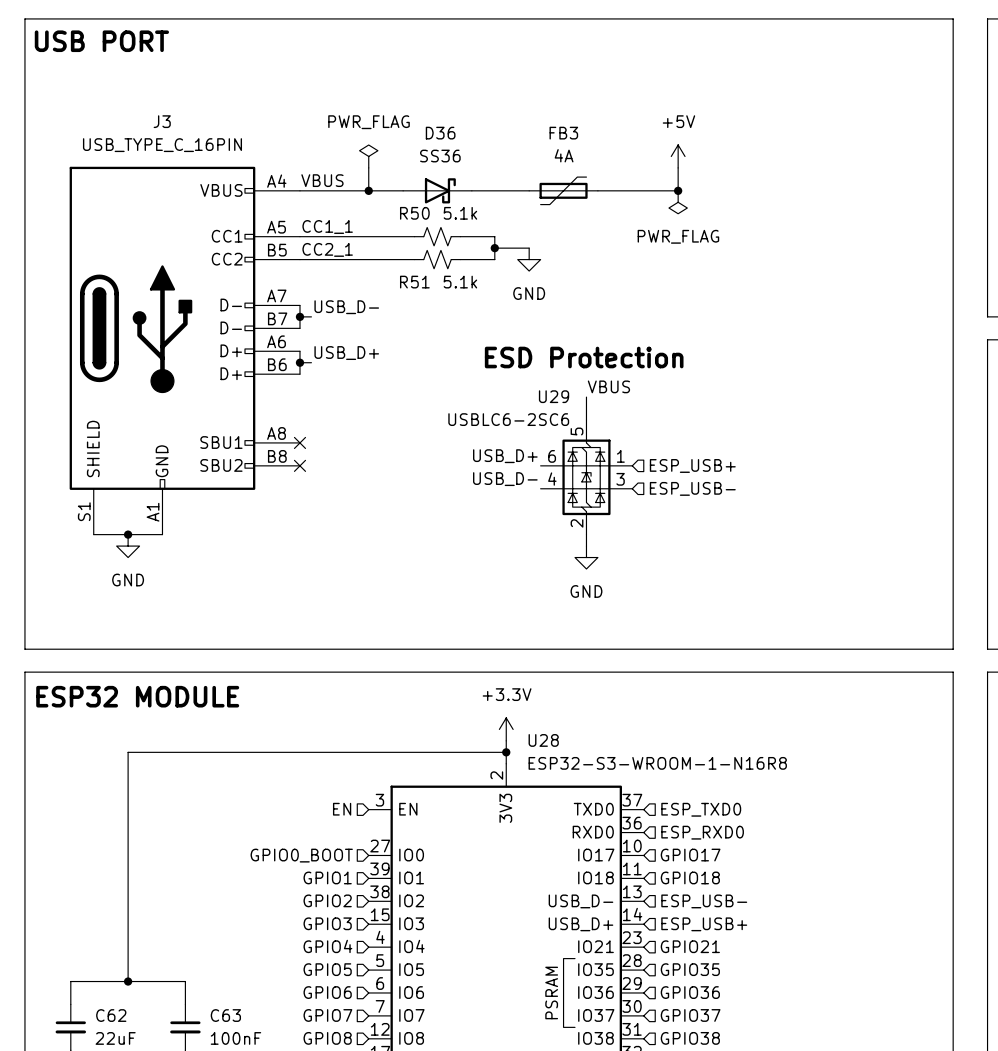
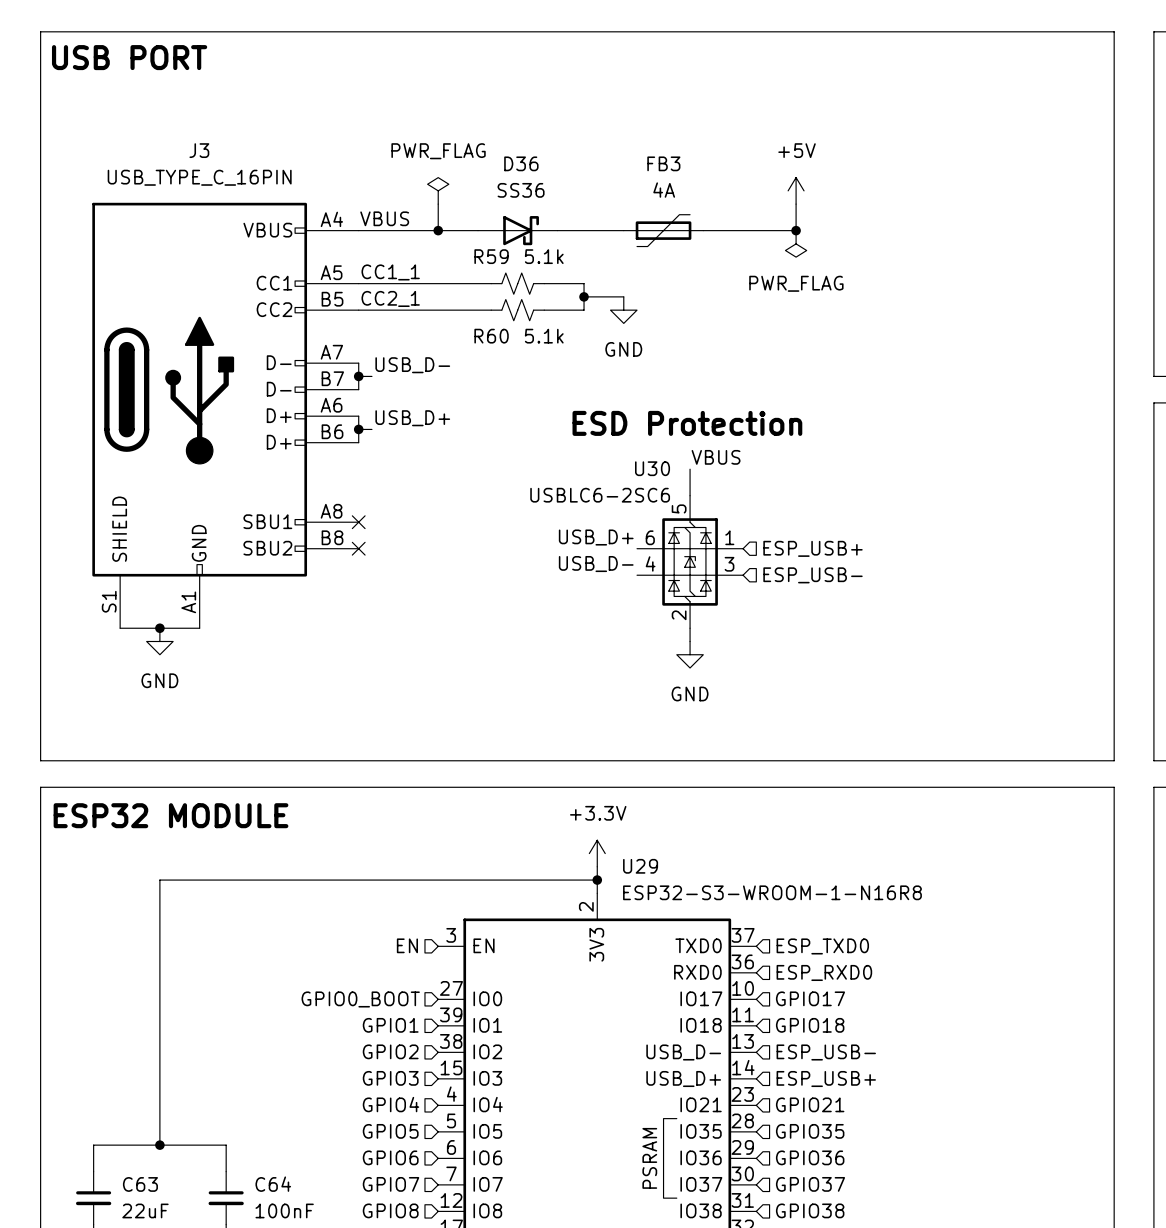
R50 name: R50 (414, 213) -> R59 (491, 256)
R51 name: R51 (414, 282) -> R60 (491, 336)
U29 name: U29 (554, 396) -> U30 (652, 468)
U28 name: U28 (543, 740) -> U29 (640, 866)
C62 name: C62 (111, 1015) -> C63 (140, 1184)
C63 name: C63 (225, 1015) -> C64 (273, 1184)

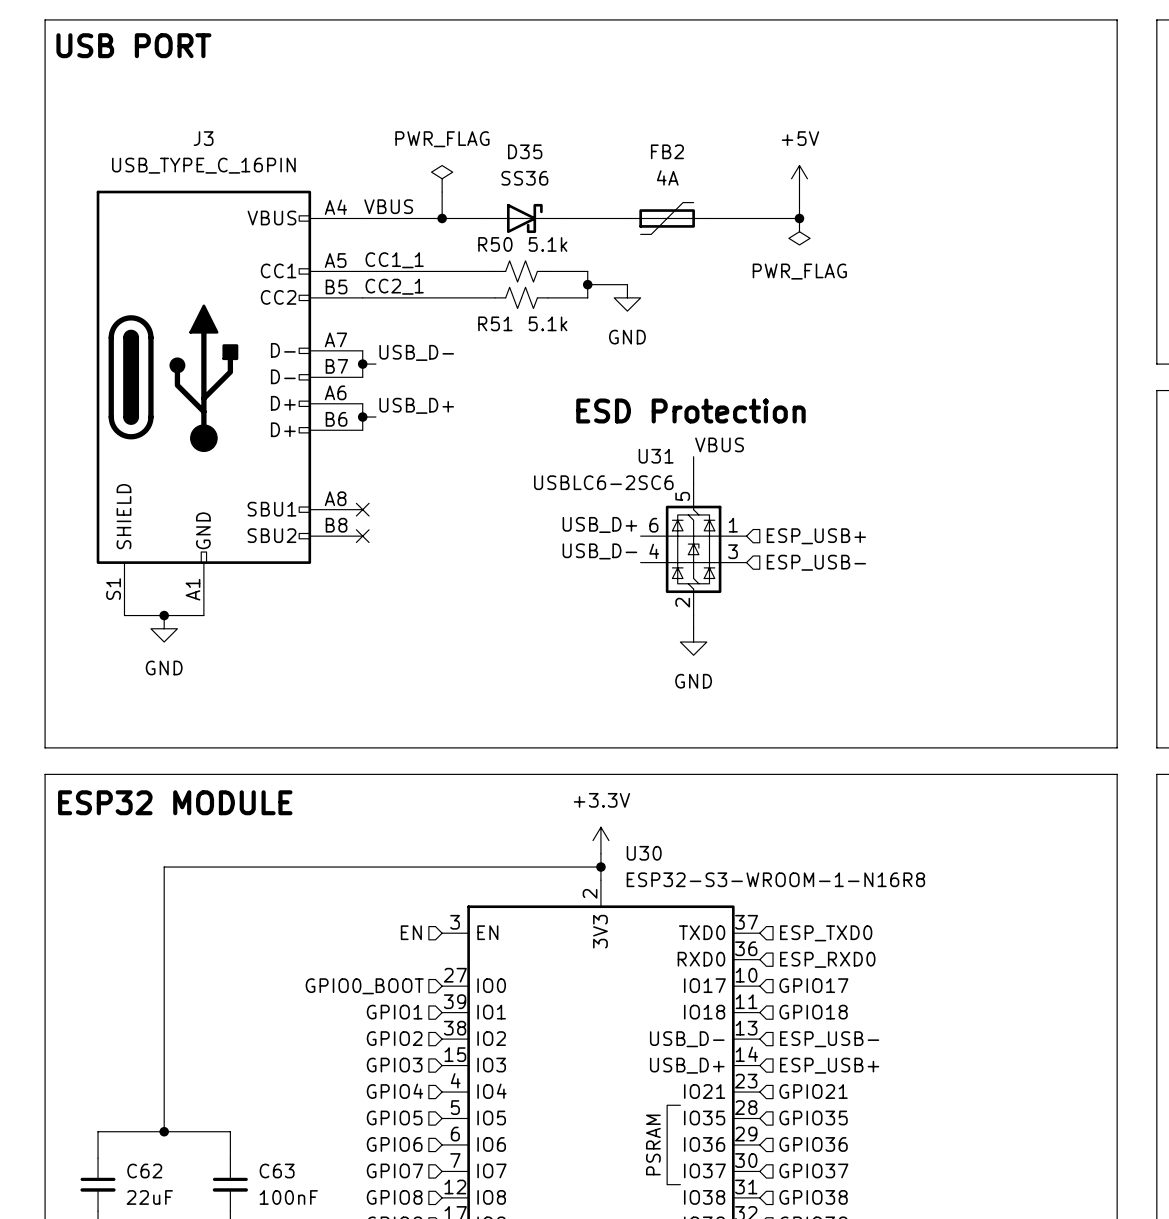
D36 name: D36 (521, 163) -> D35 (525, 151)
FB3 name: FB3 (663, 163) -> FB2 (667, 151)
R59 name: R59 (491, 256) -> R50 (495, 244)
R60 name: R60 (491, 336) -> R51 (495, 323)
U30 name: U30 (652, 468) -> U31 (656, 456)
U29 name: U29 (640, 866) -> U30 (644, 853)
C63 name: C63 (140, 1184) -> C62 (144, 1171)
C64 name: C64 (273, 1184) -> C63 (277, 1171)

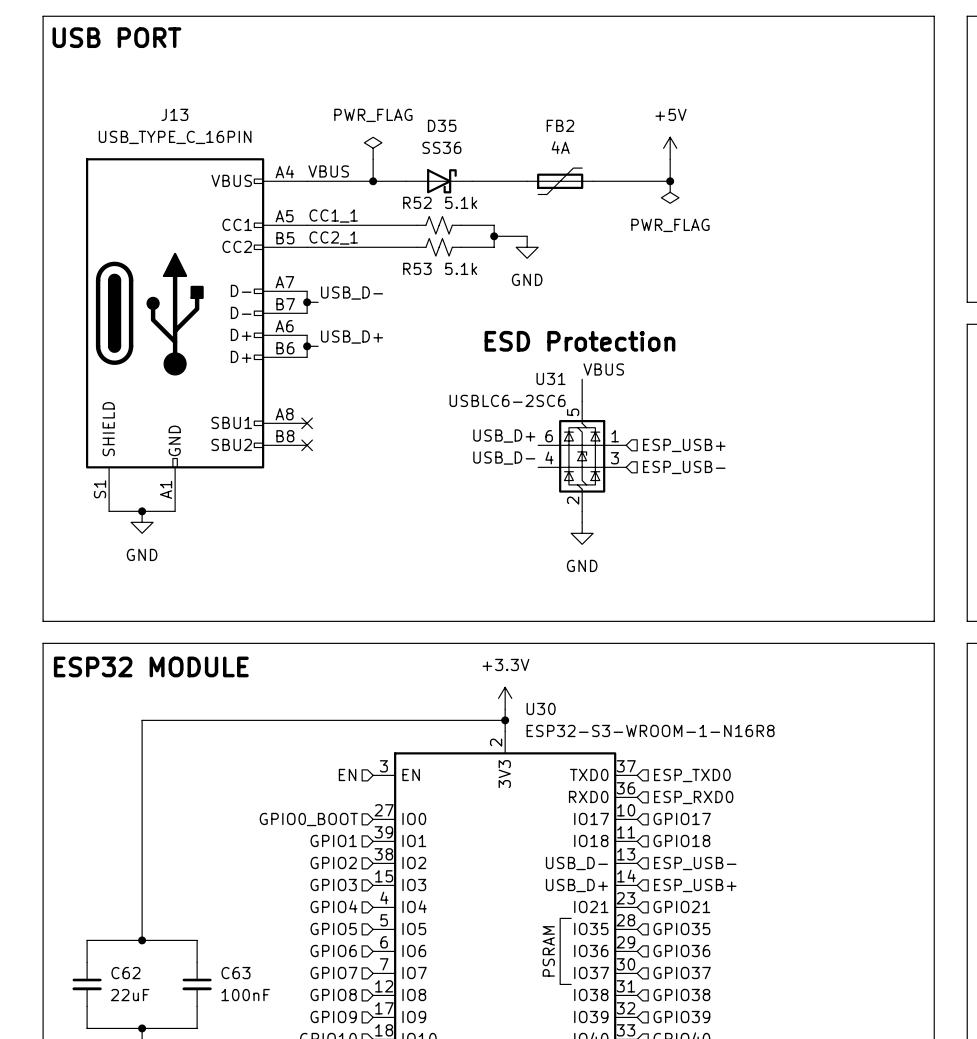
J3 name: J3 (203, 138) -> J13 (174, 114)
R50 name: R50 (495, 244) -> R52 (417, 202)
R51 name: R51 (495, 323) -> R53 (417, 268)

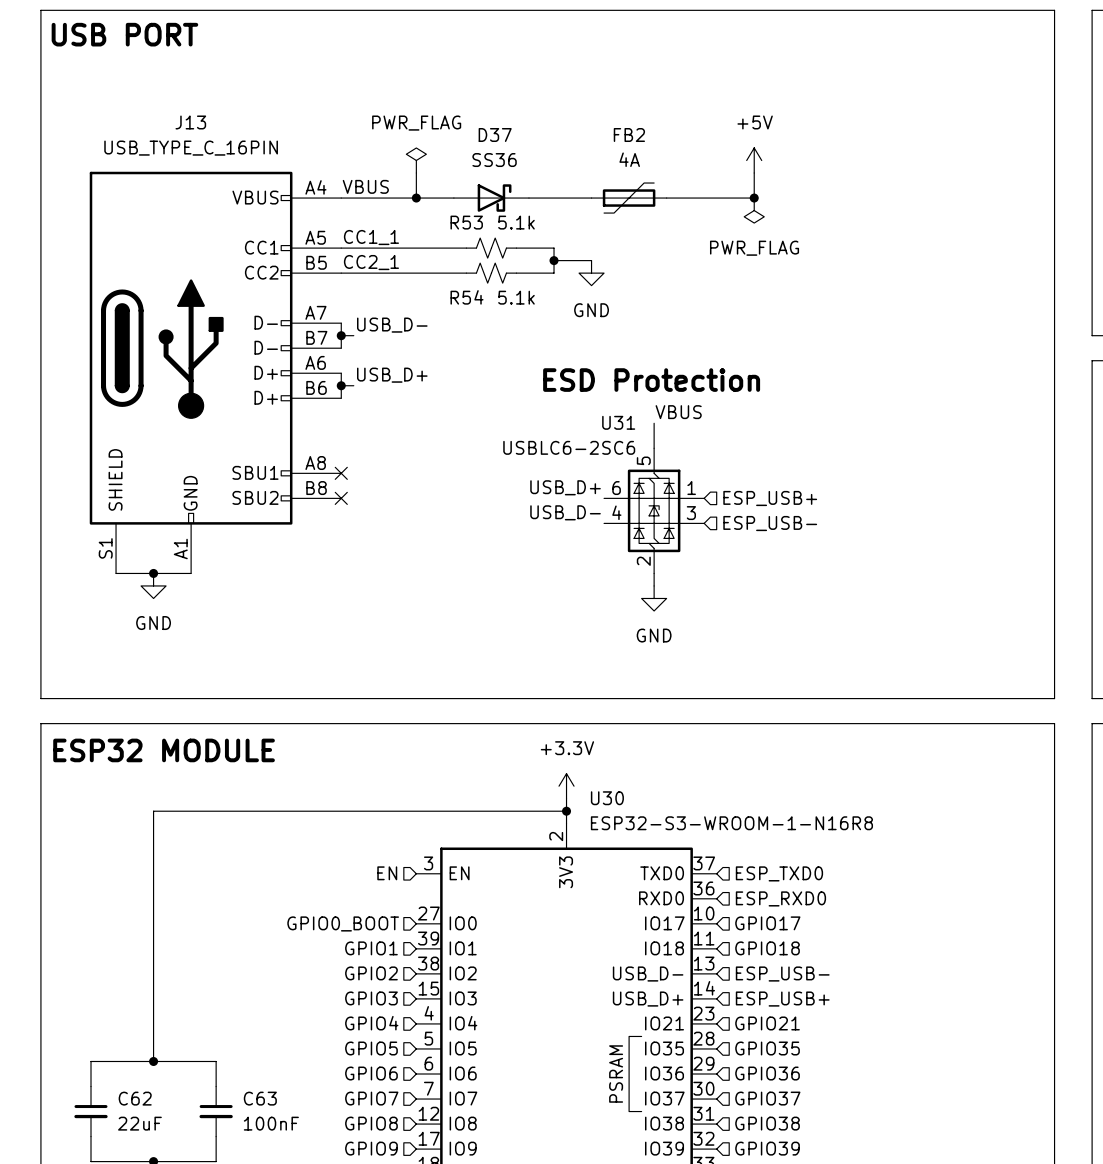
D35 name: D35 (442, 125) -> D37 (495, 135)
R52 name: R52 (417, 202) -> R53 (466, 222)
R53 name: R53 (417, 268) -> R54 (467, 297)

